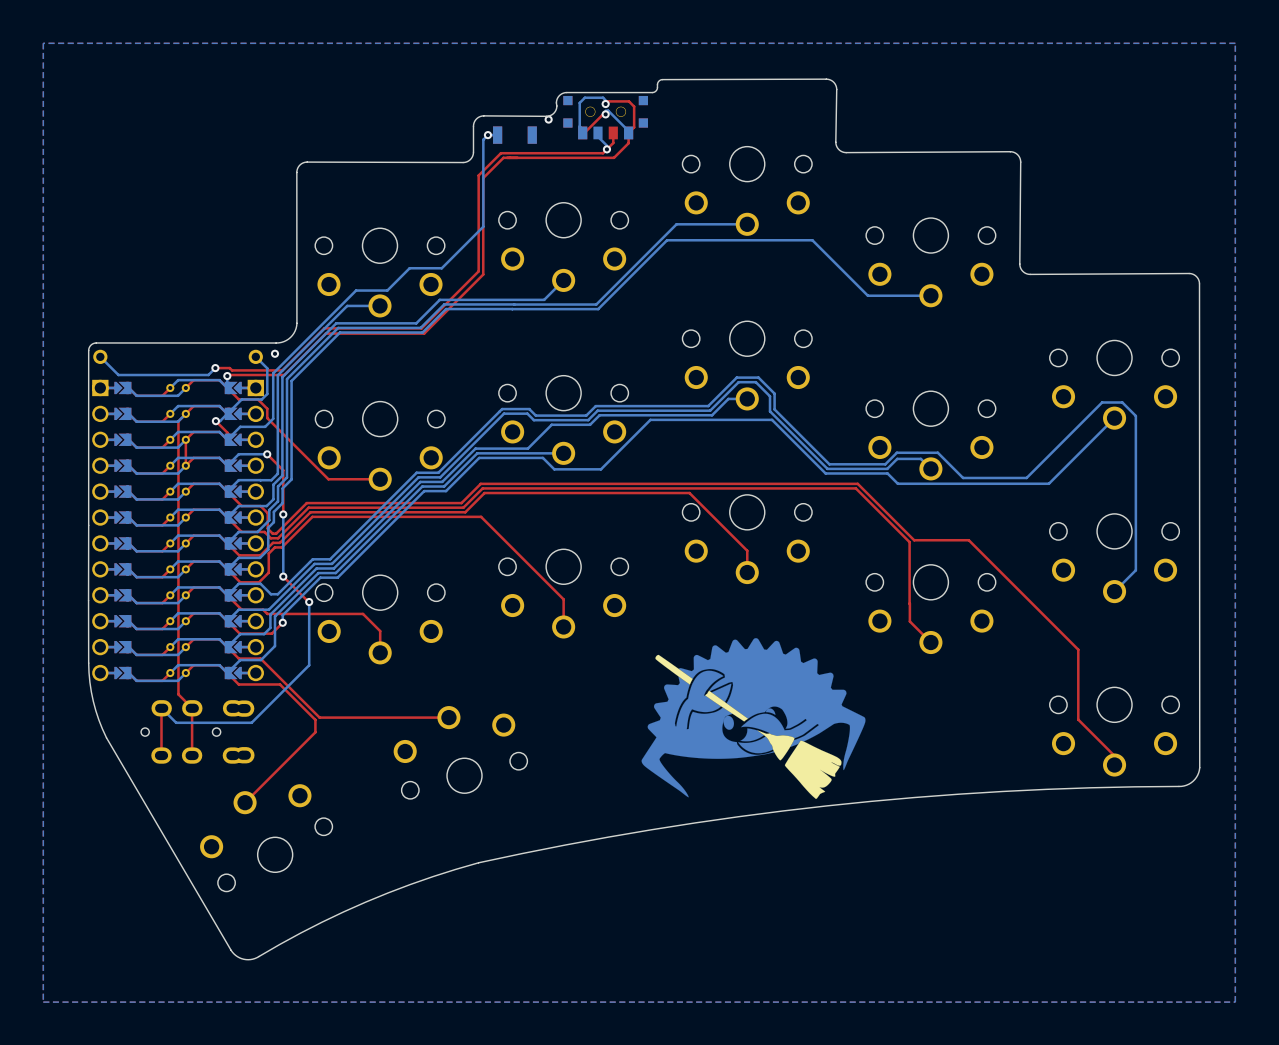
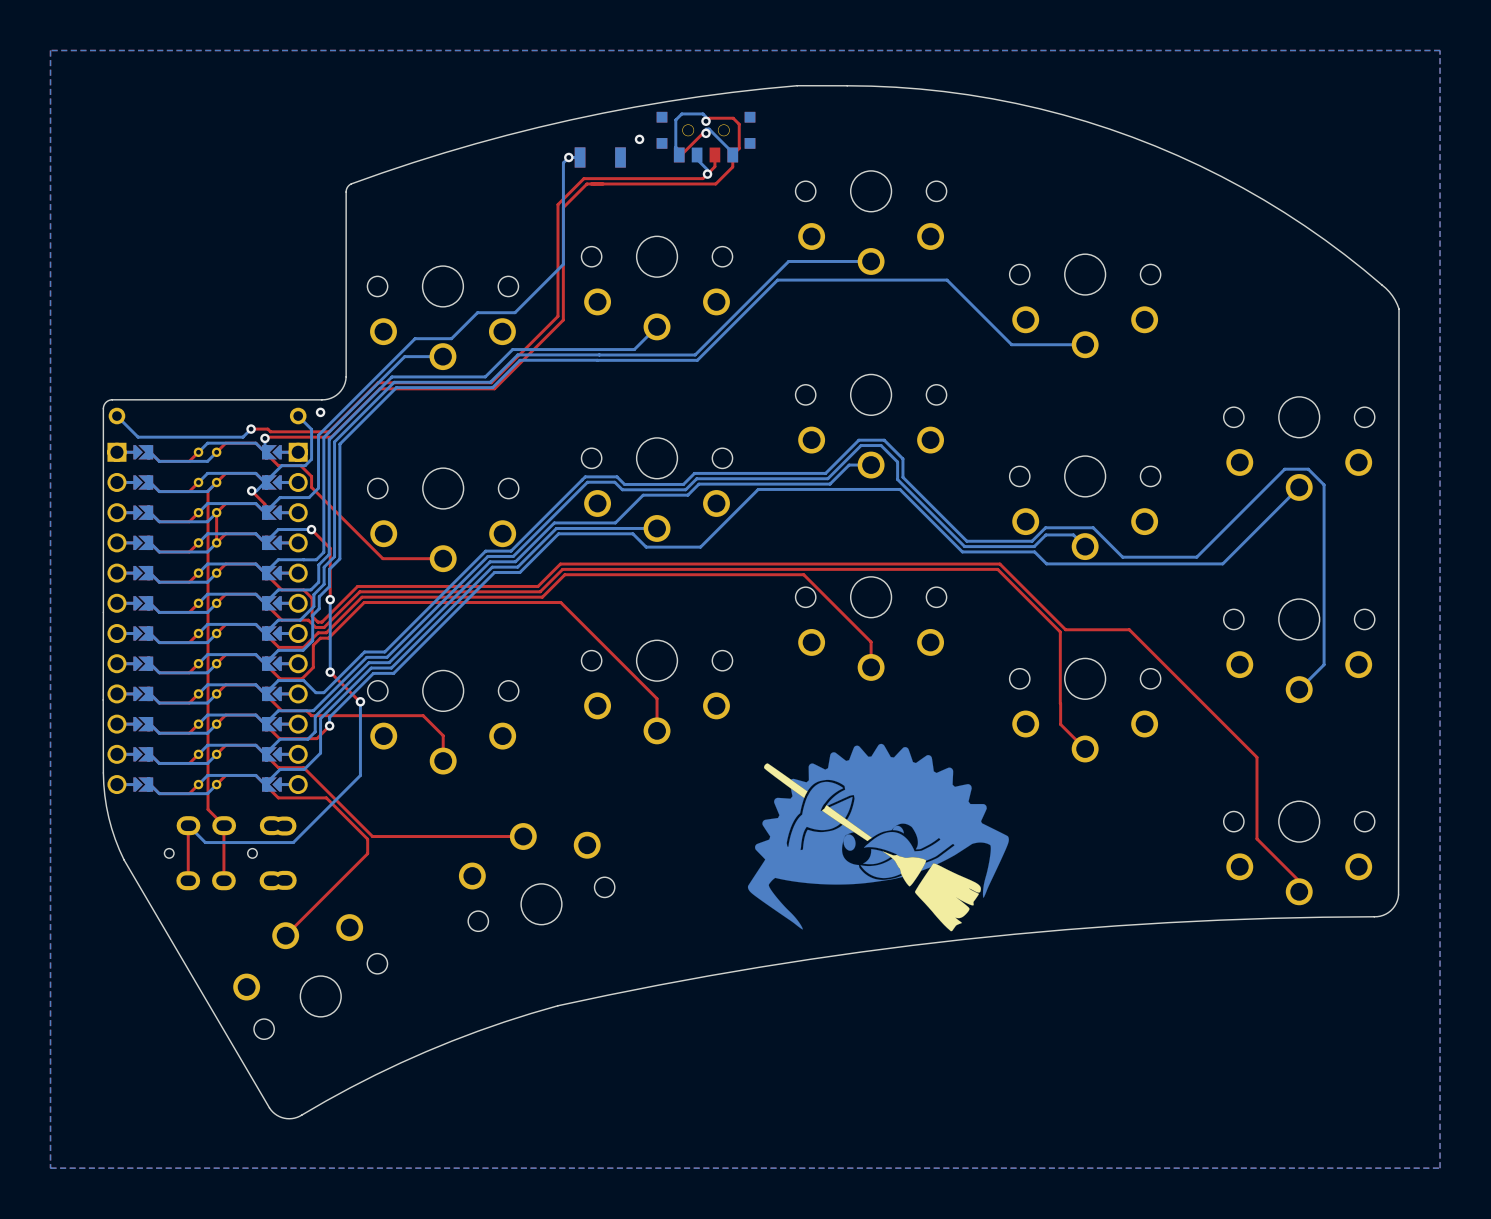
board edge: (296, 323) (296, 172) (300, 164) (307, 162) (465, 162) (473, 154) (473, 124) (477, 118) (483, 115) (549, 115) (555, 111) (557, 98) (564, 92) (652, 92) (656, 89) (658, 81) (662, 79) (827, 79) (832, 81) (836, 86) (835, 143) (842, 151) (1014, 152) (1020, 160) (1019, 264) (1023, 272) (1030, 274) (1189, 273) (1195, 275) (1199, 281) (1199, 767) -> (346, 376) (346, 192) (348, 186) (444, 152) (539, 127) (635, 107) (764, 88) (797, 85) (895, 87) (968, 94) (1039, 108) (1132, 137) (1199, 165) (1263, 199) (1324, 239) (1385, 288) (1395, 299) (1399, 309) (1398, 894)

